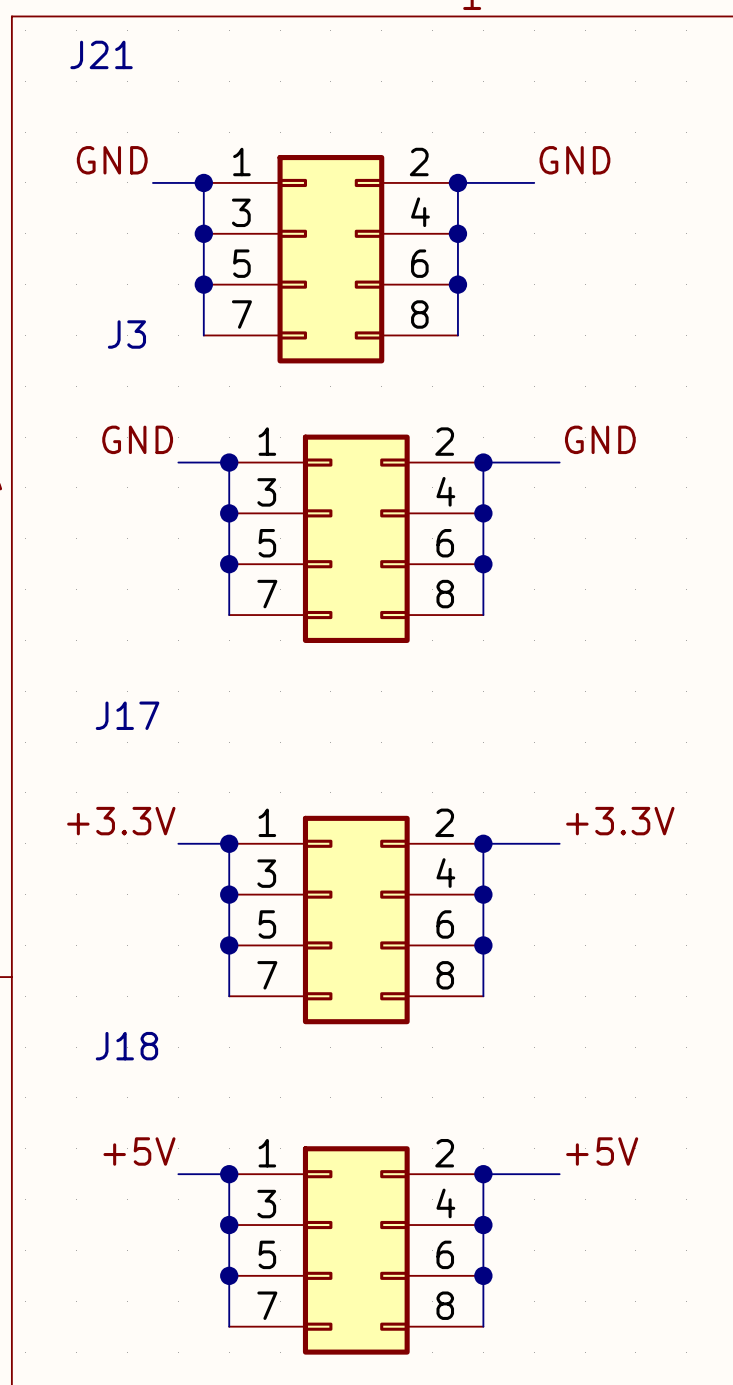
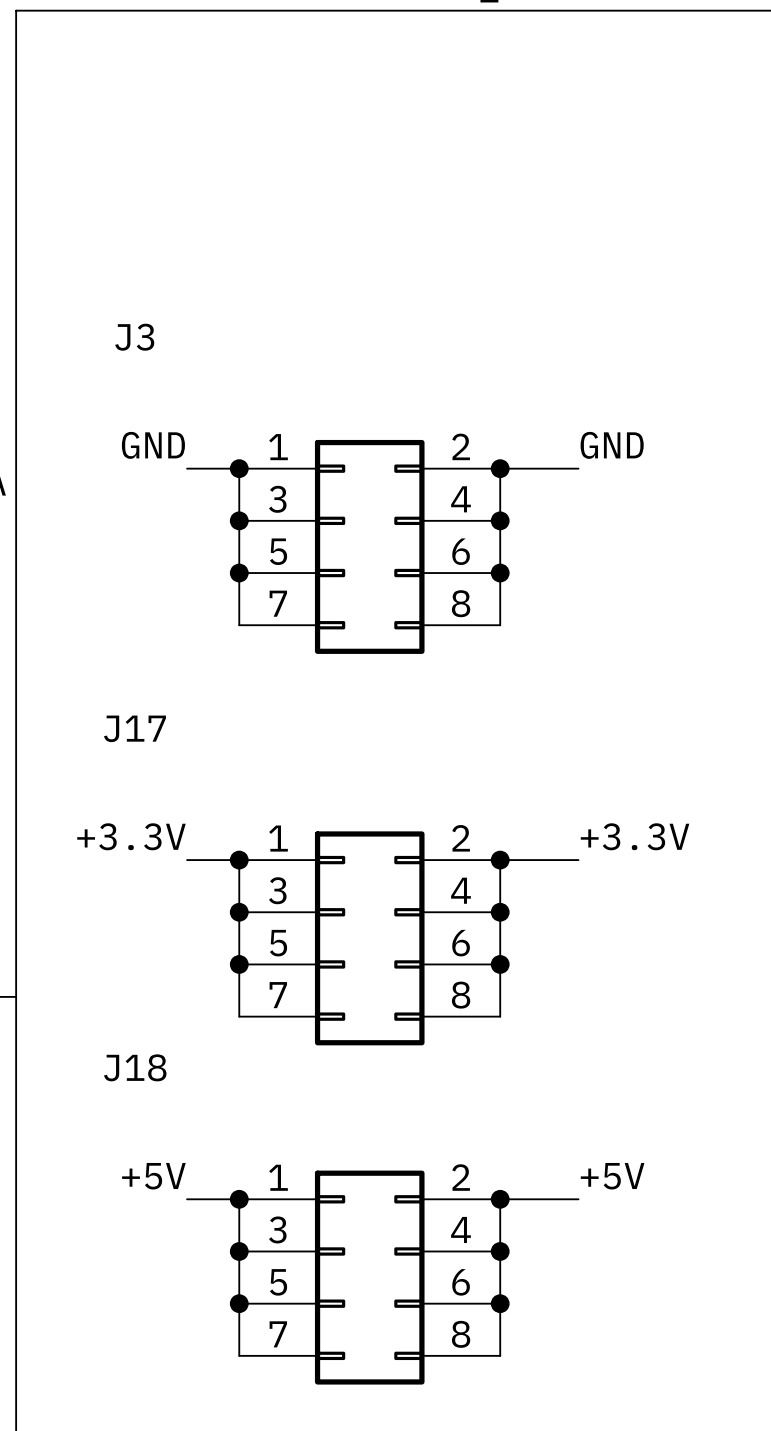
label: GND (112, 160) -> none
label: GND (574, 160) -> none
wire: (152, 182) (203, 182) (203, 335) -> none
junction: (203, 182) -> none
junction: (457, 182) -> none
wire: (534, 182) (457, 182) (457, 335) -> none
junction: (203, 233) -> none
junction: (457, 233) -> none
J21: (330, 259) -> none
junction: (203, 284) -> none
junction: (457, 284) -> none

